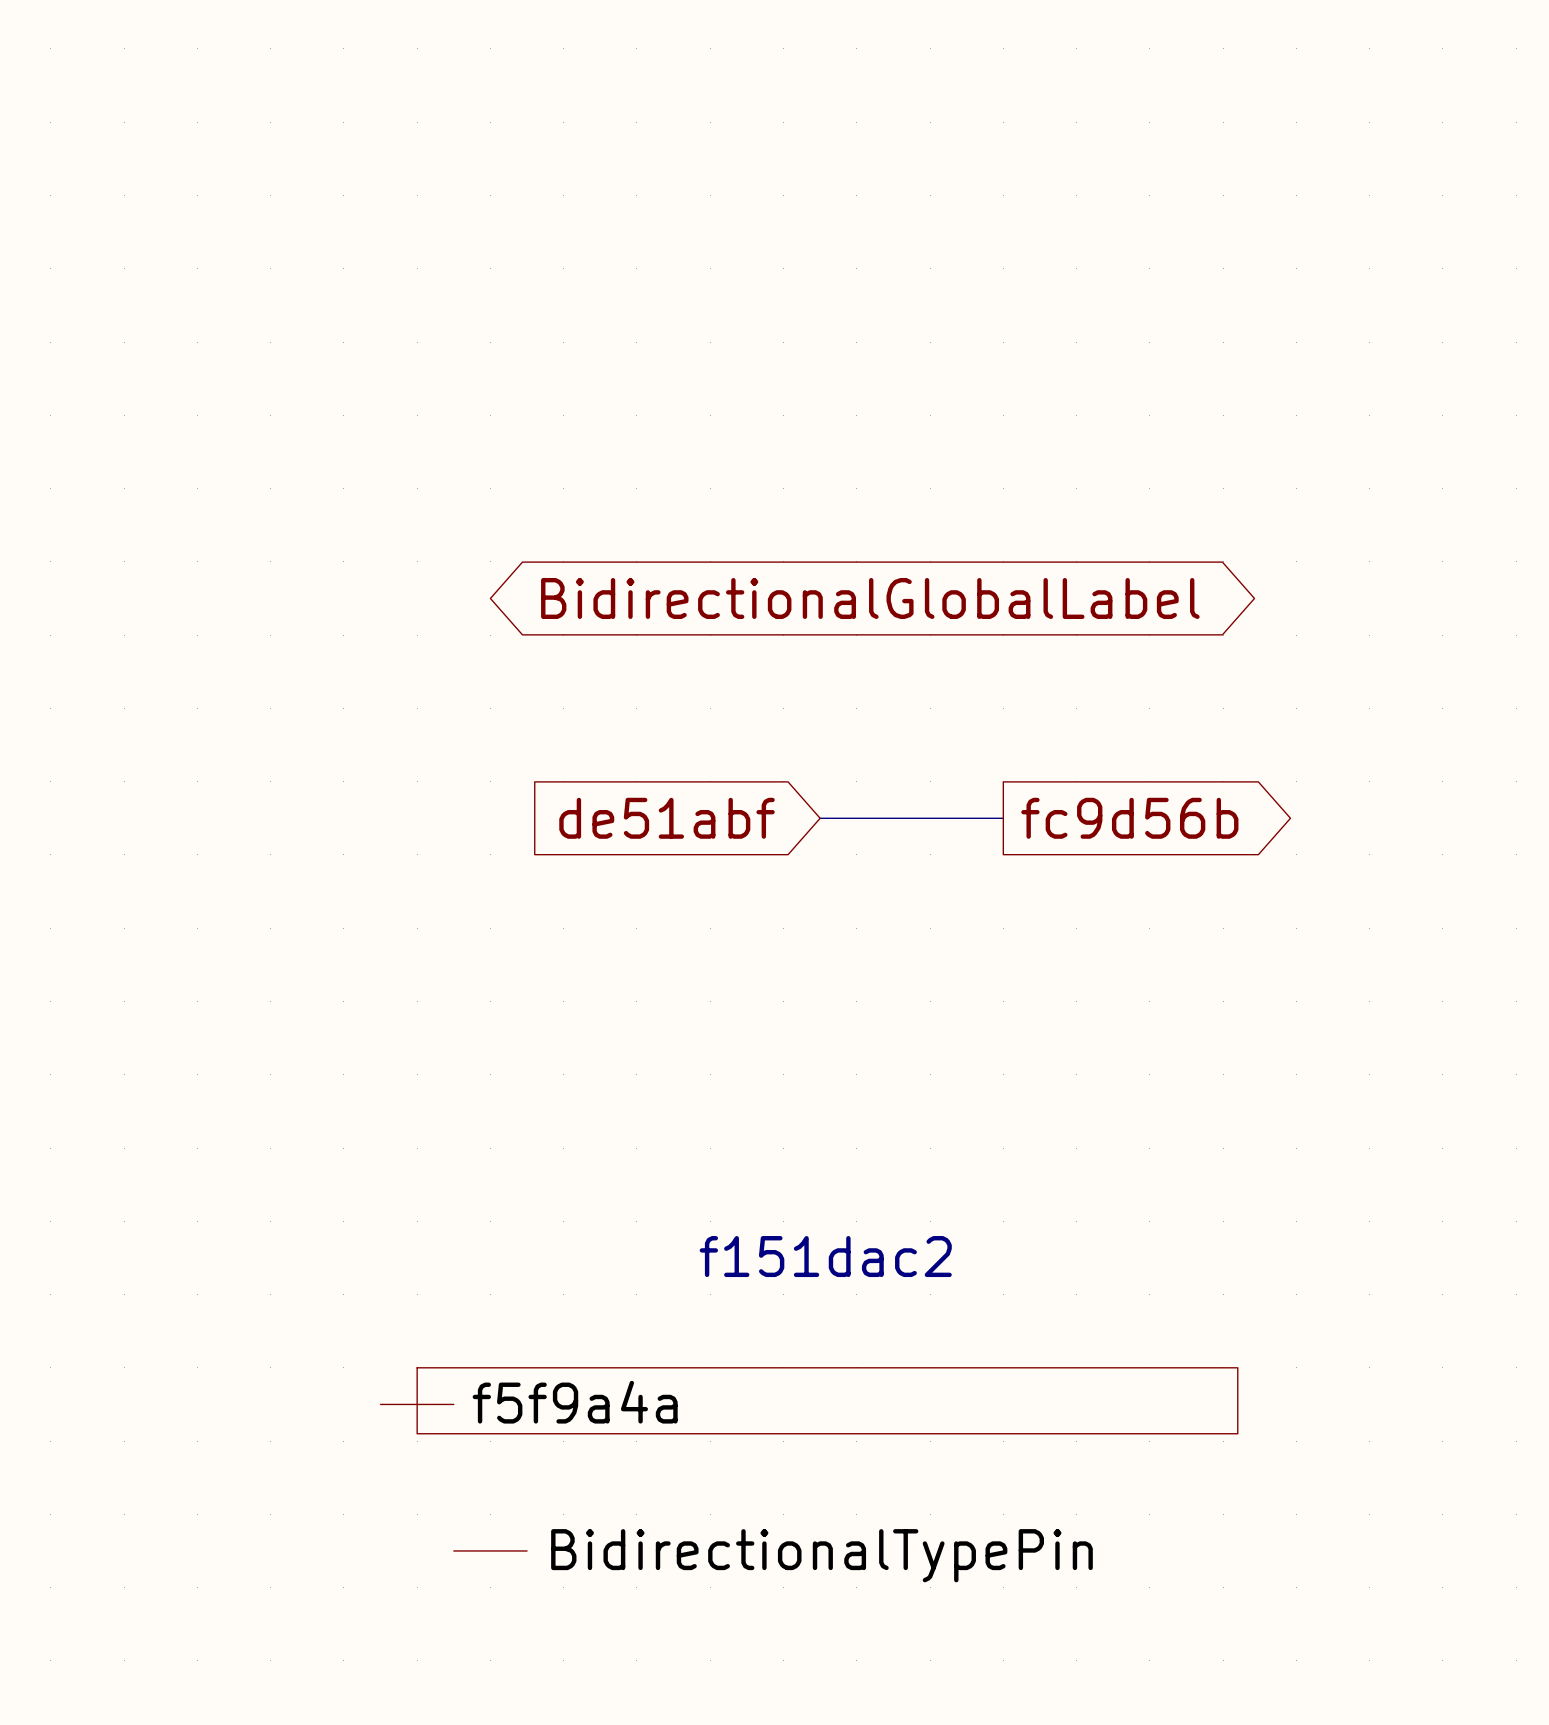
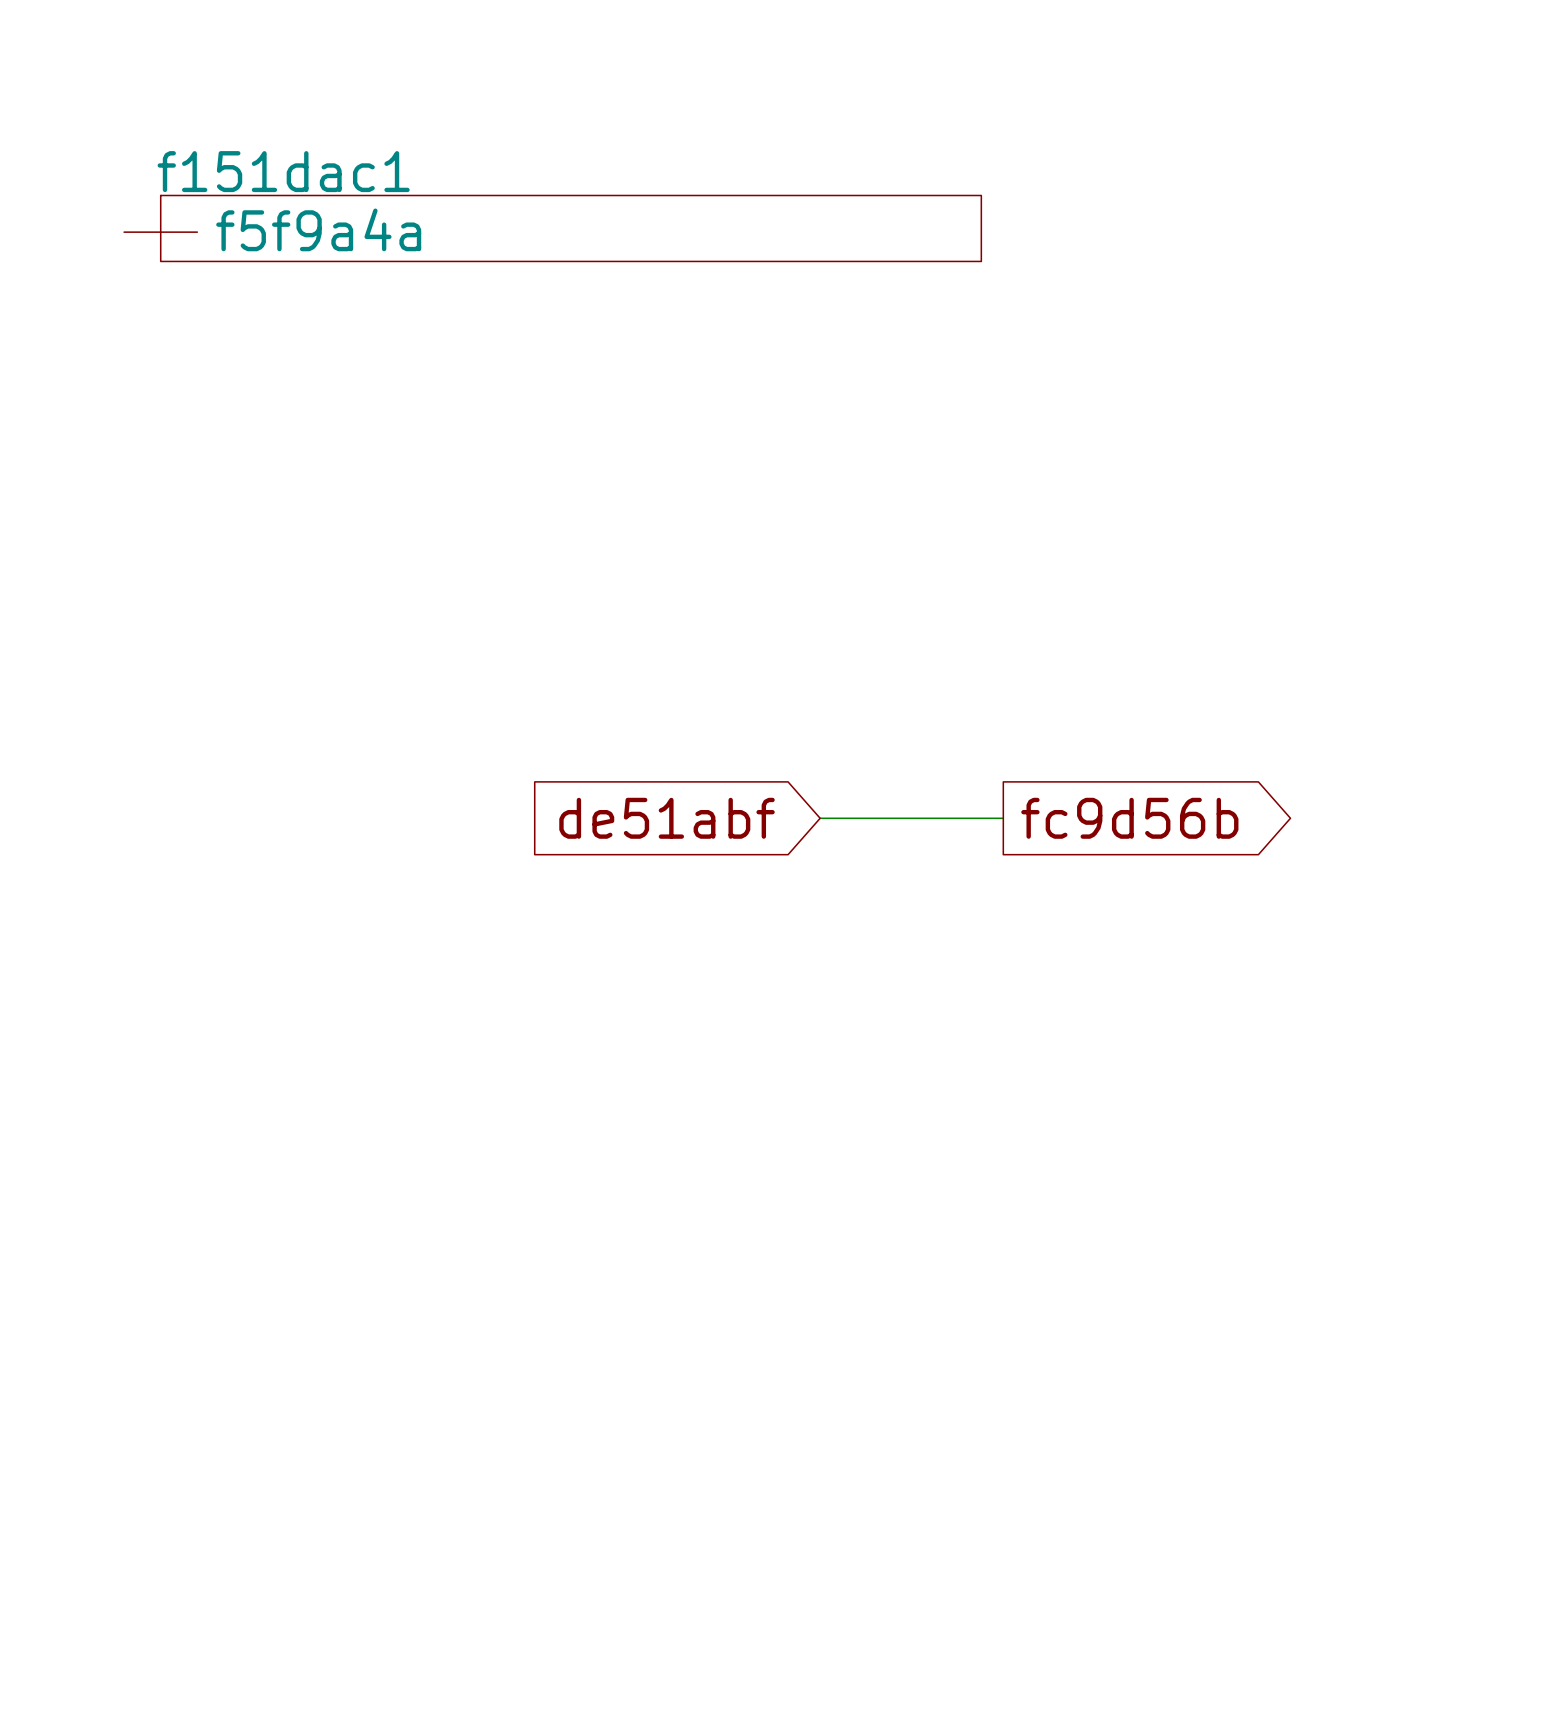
f151dac1: none -> (552, 228)
global label: BidirectionalGlobalLabel (870, 598) -> none
f151dac2: (809, 1459) -> none

